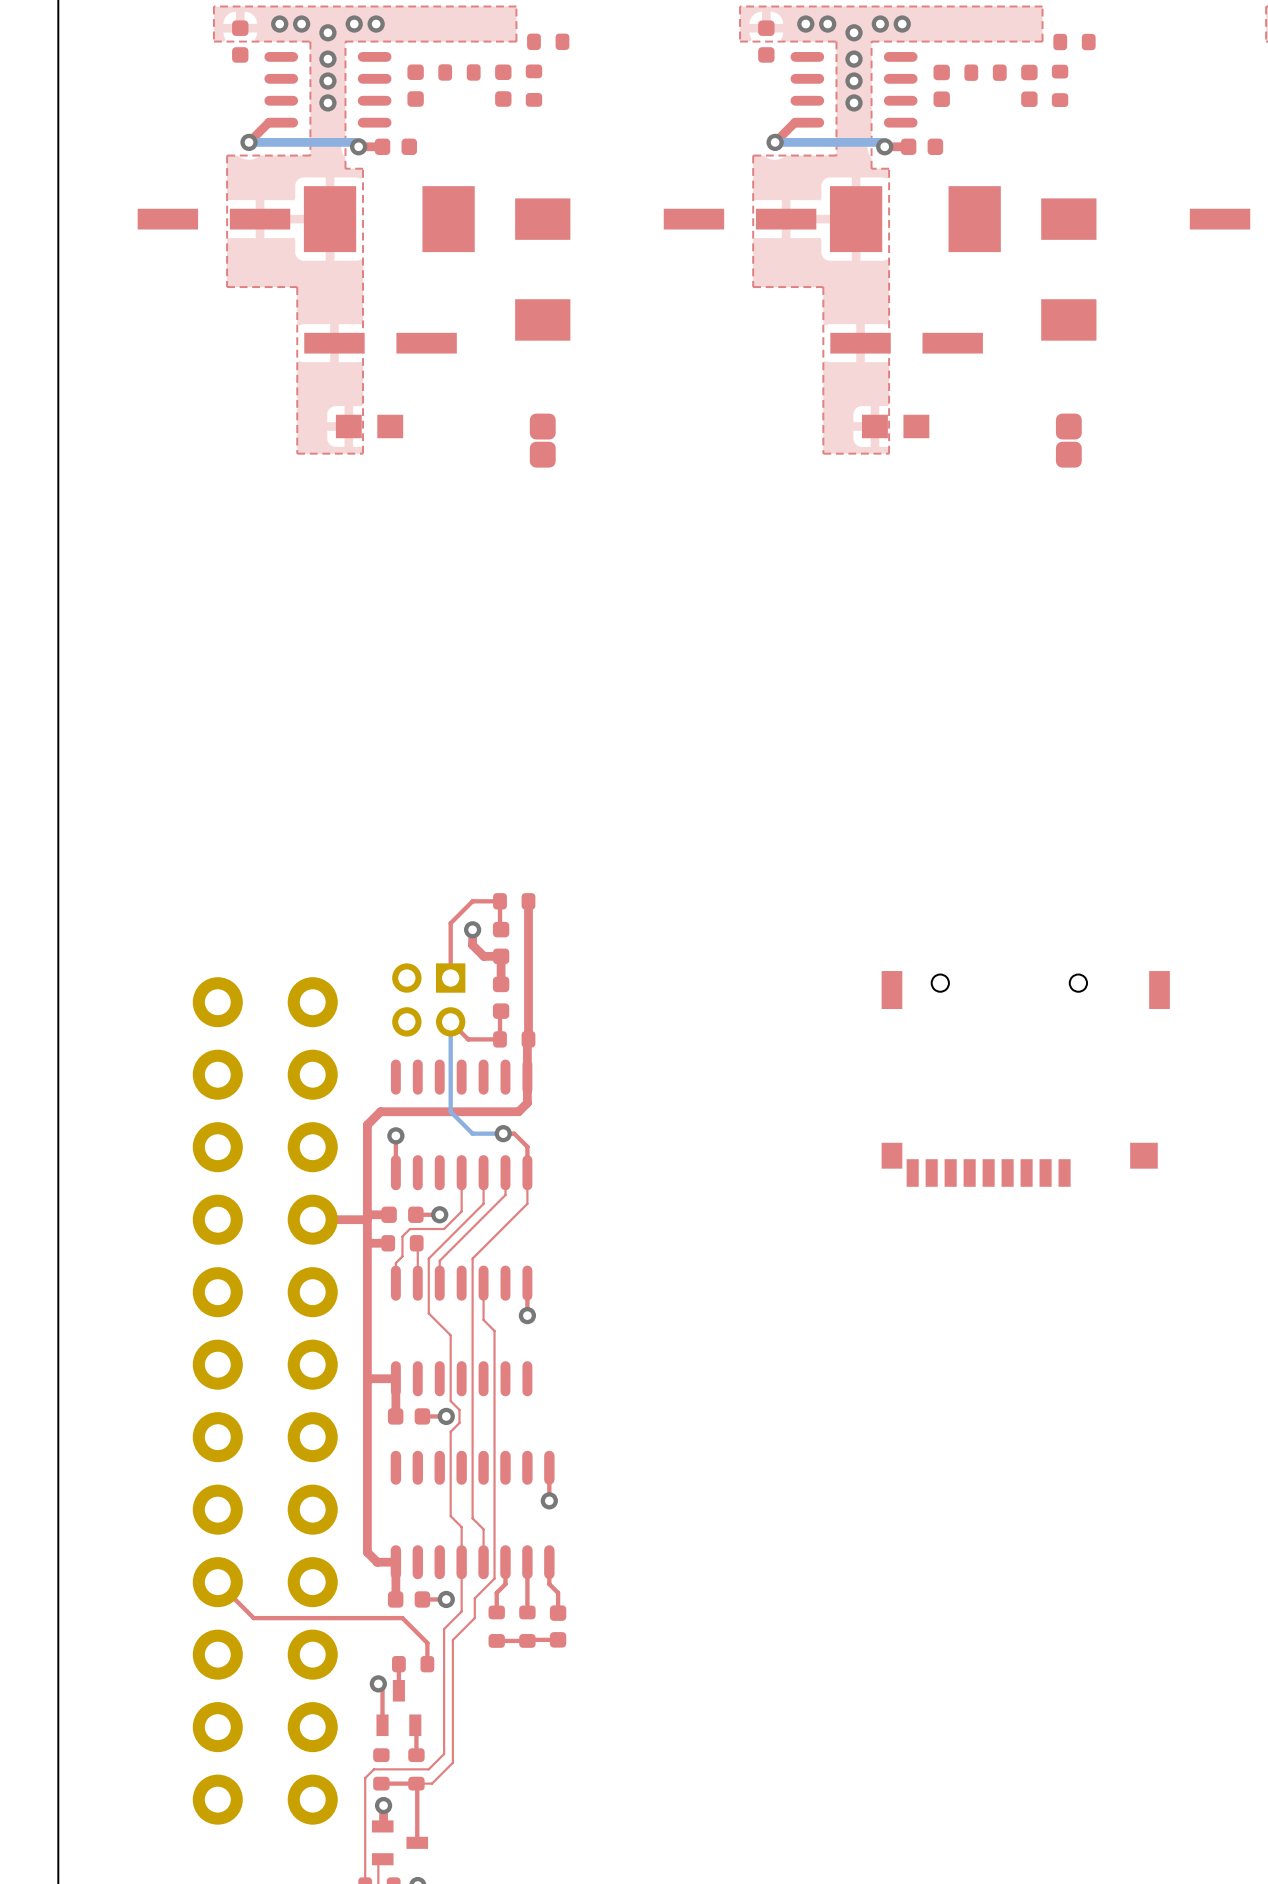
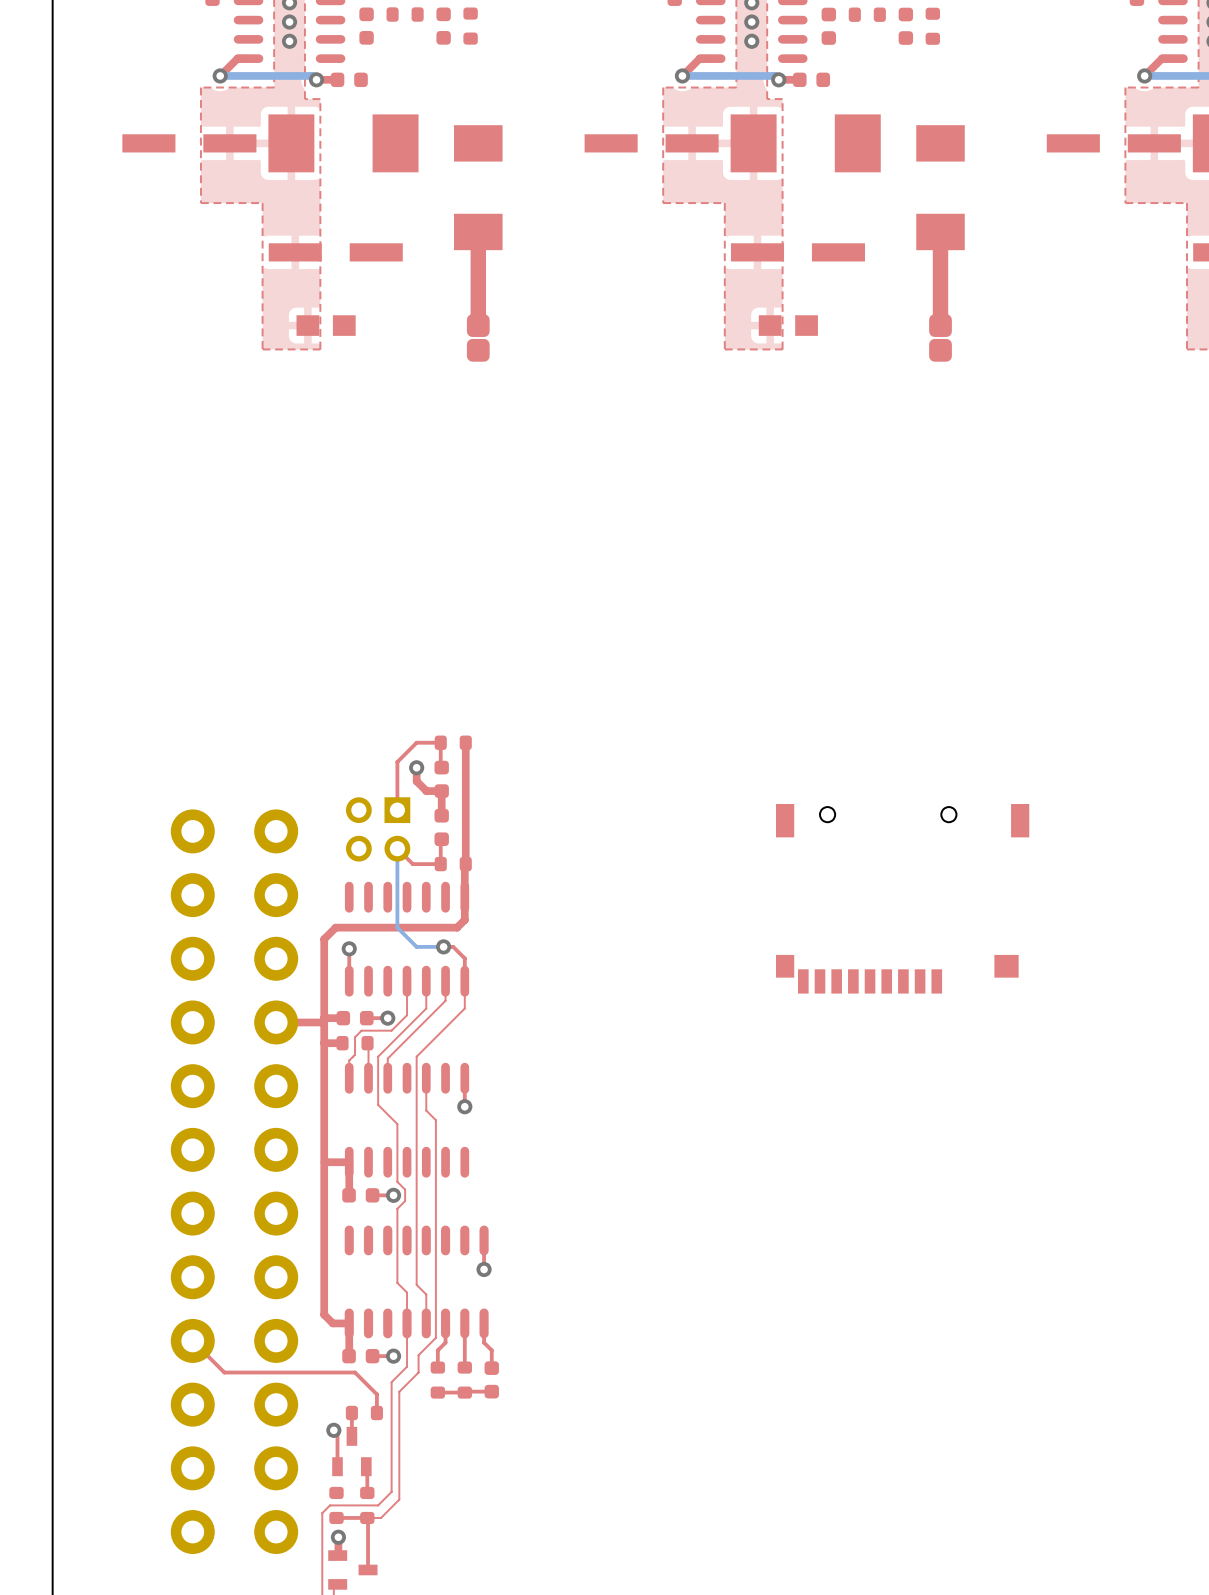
top track: none -> (478, 231) (478, 325)
top track: none -> (940, 231) (940, 325)

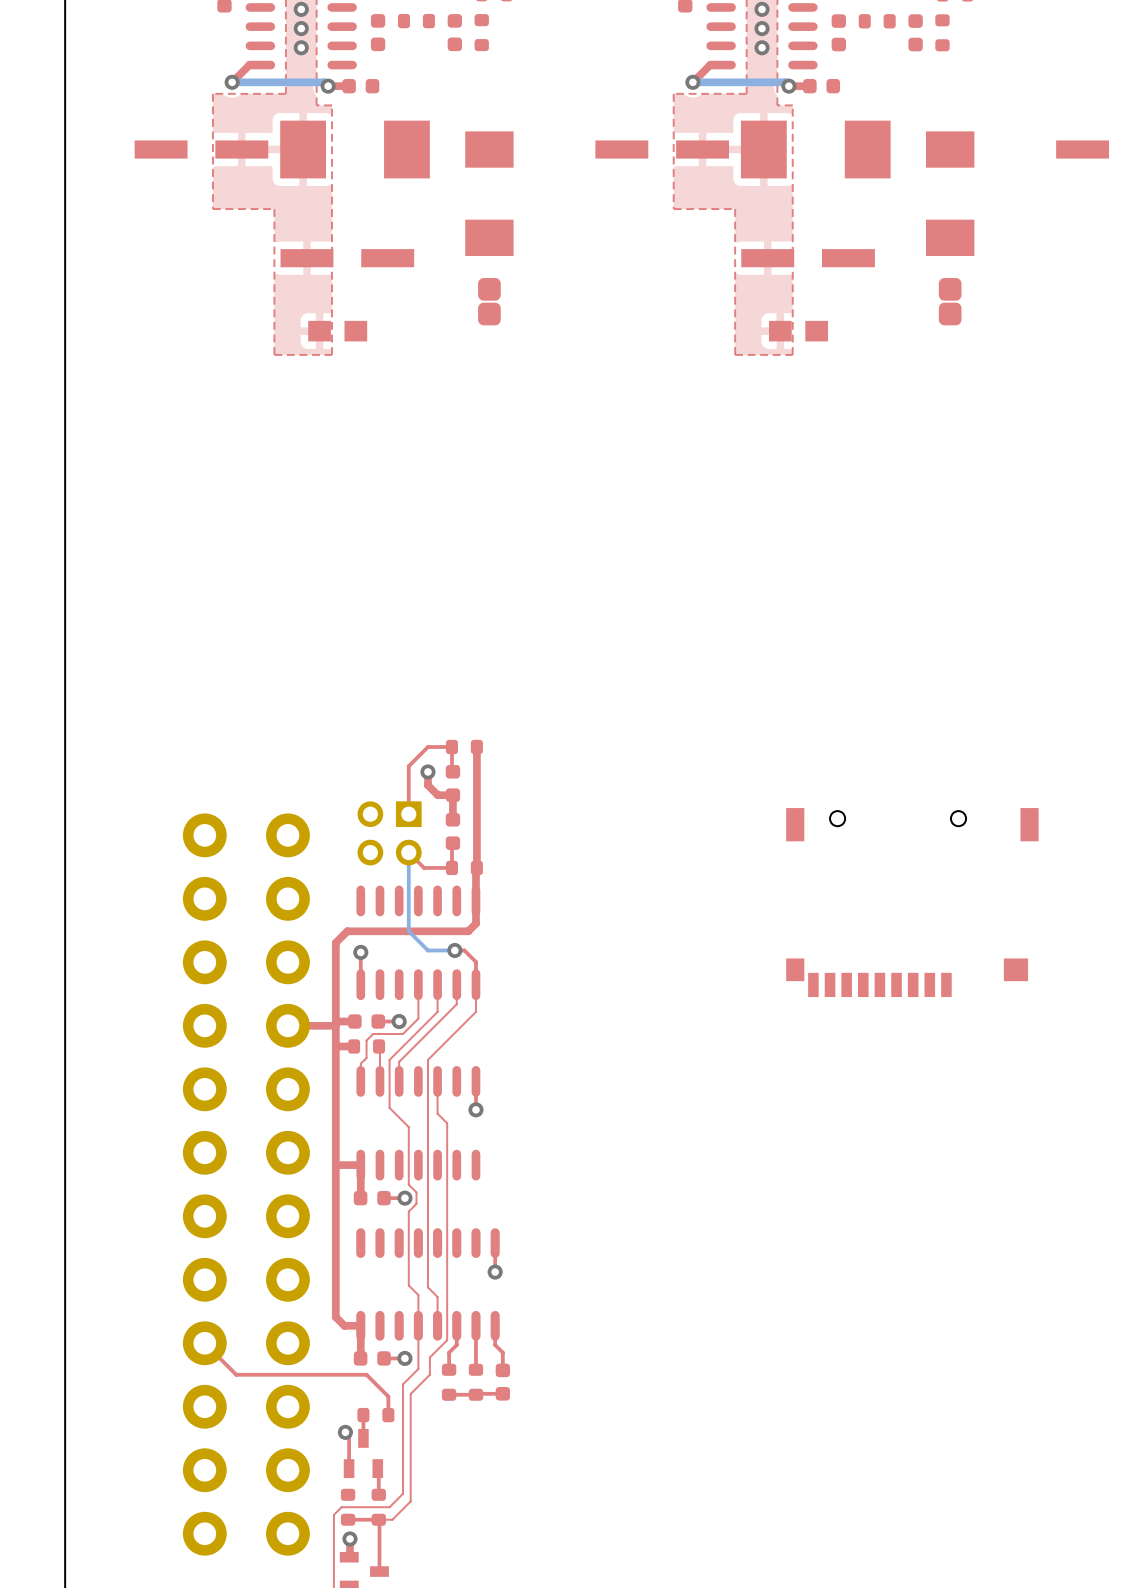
top track: (478, 231) (478, 325) -> none
top track: (940, 231) (940, 325) -> none
part position: (478, 337) -> (489, 301)
part position: (940, 337) -> (950, 301)

